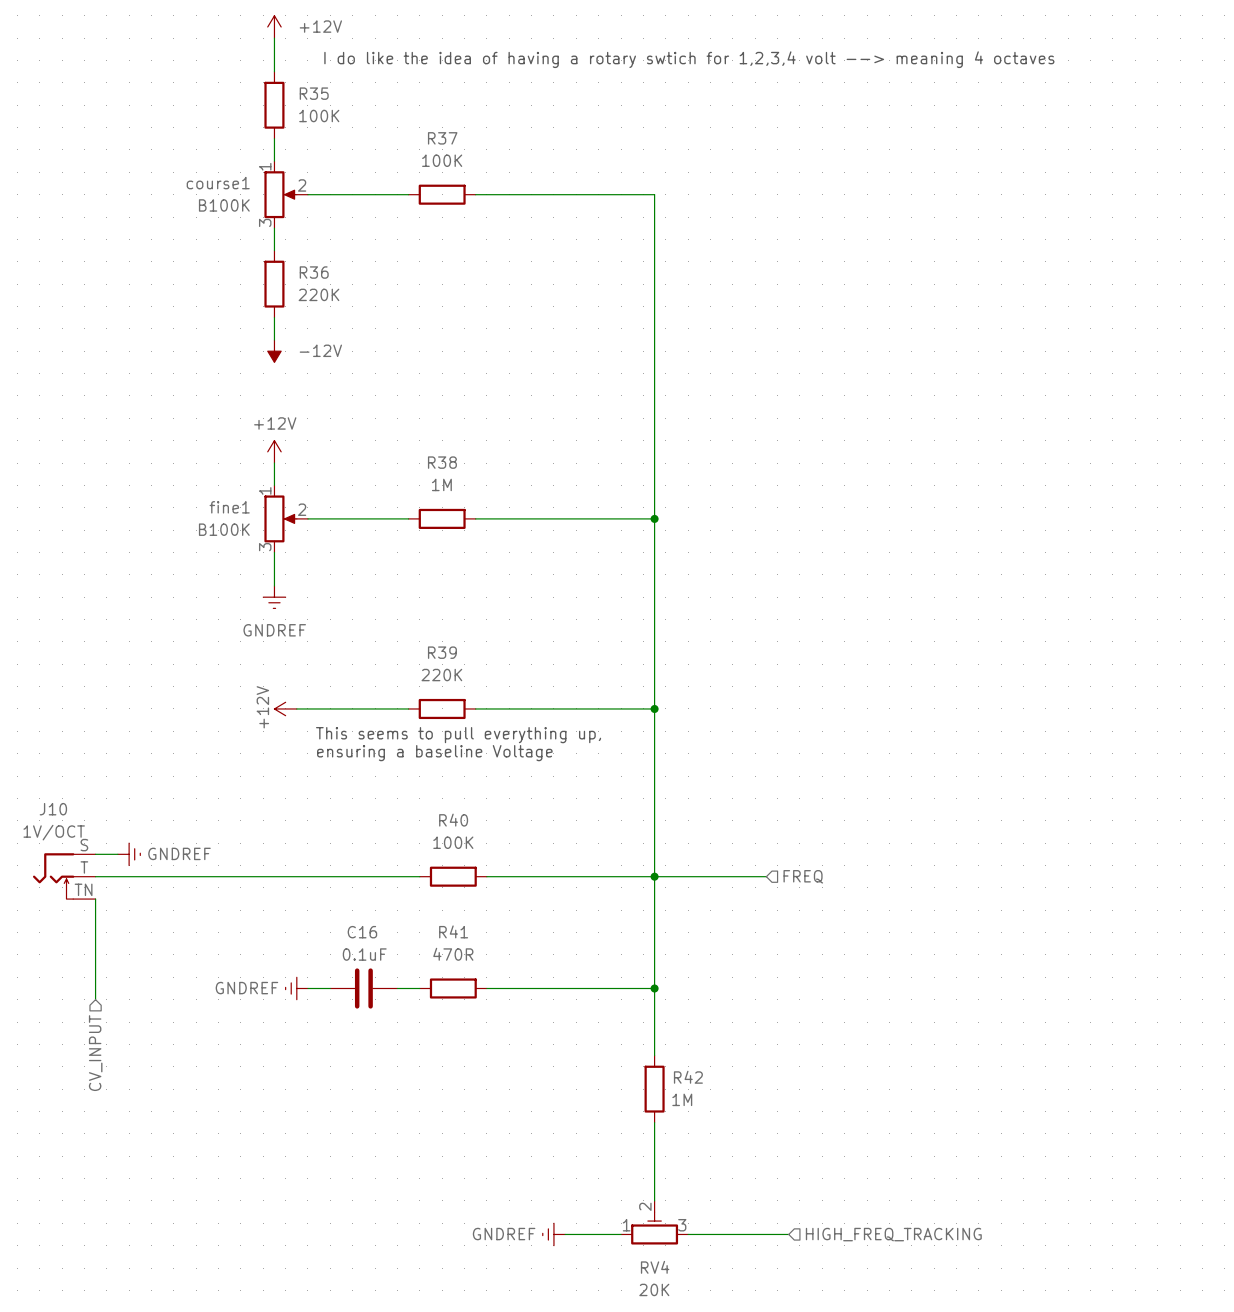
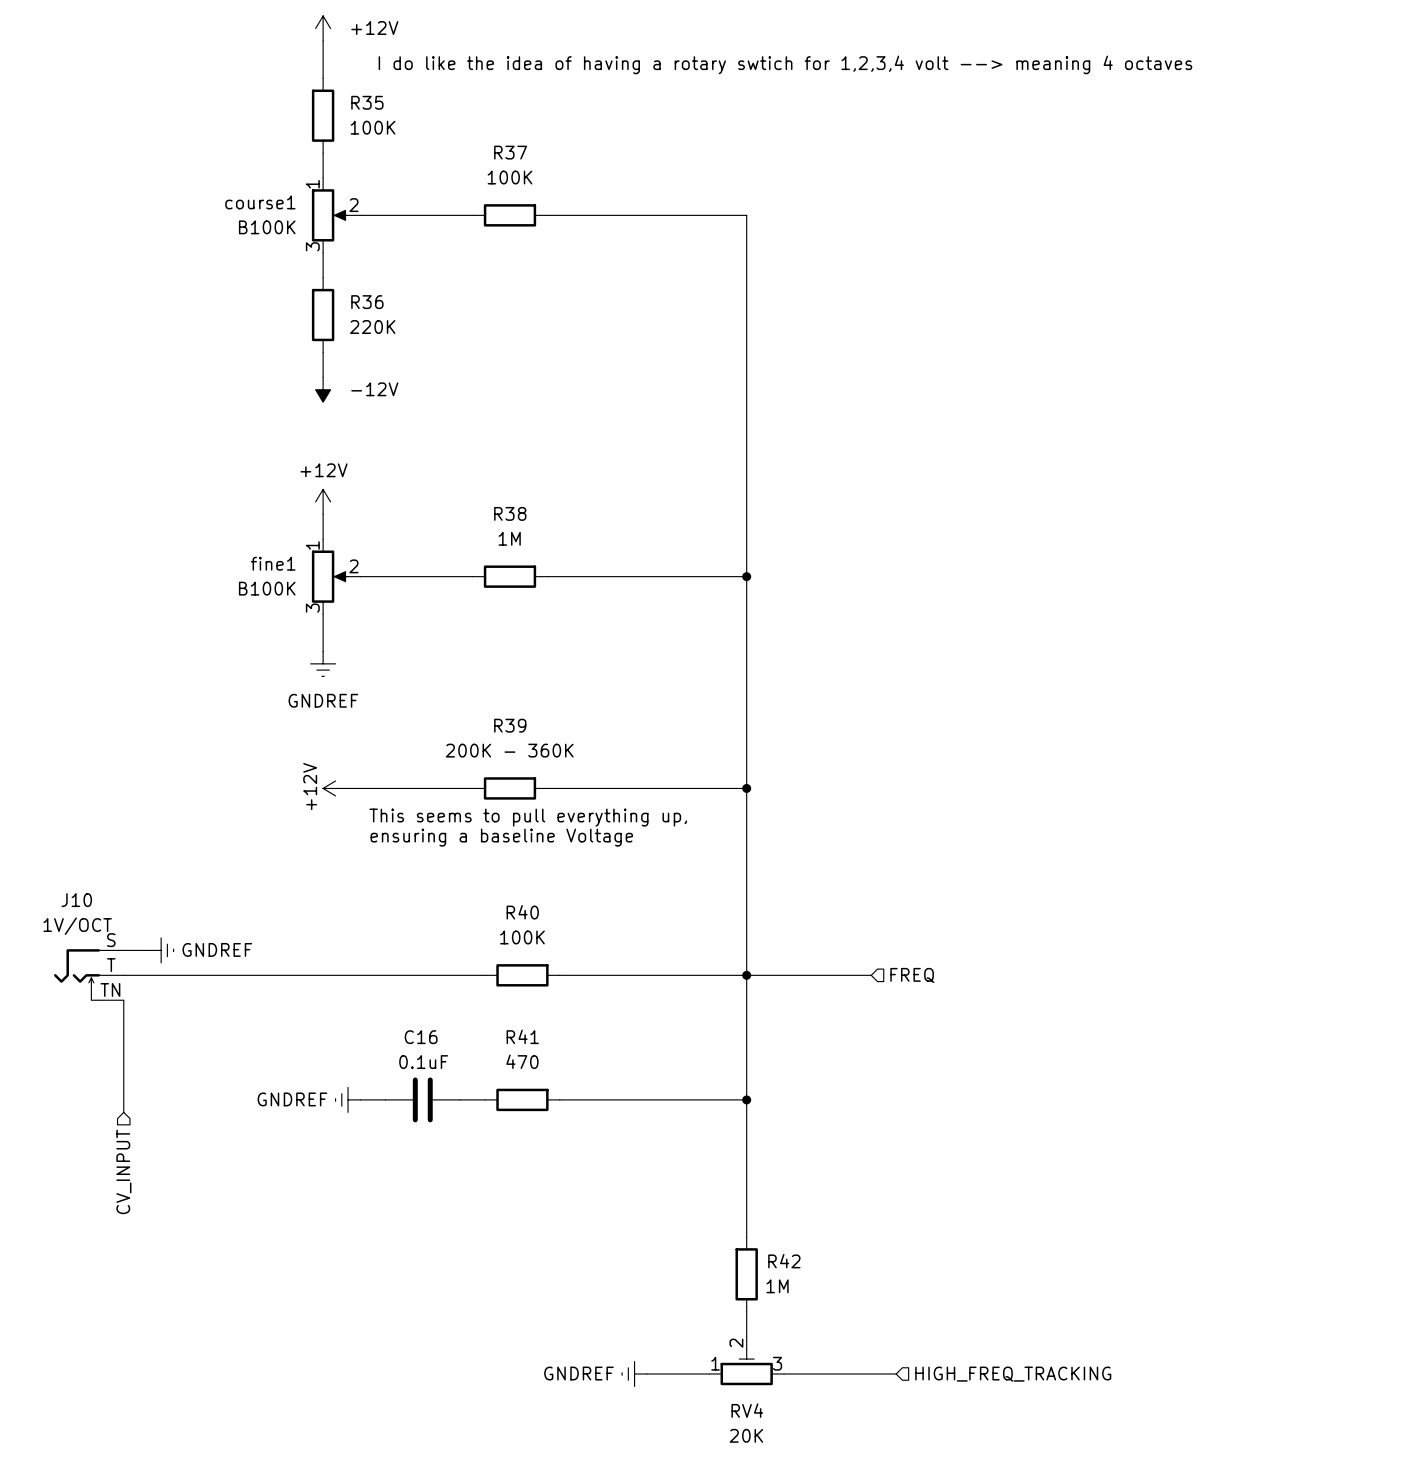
R39 value: 220K (441, 675) -> 200K - 360K (509, 750)
R41 value: 470R (453, 954) -> 470 (522, 1061)
R42 position: (654, 1089) -> (746, 1274)
wire: (654, 1122) (654, 1178) -> (746, 1174) (746, 1236)

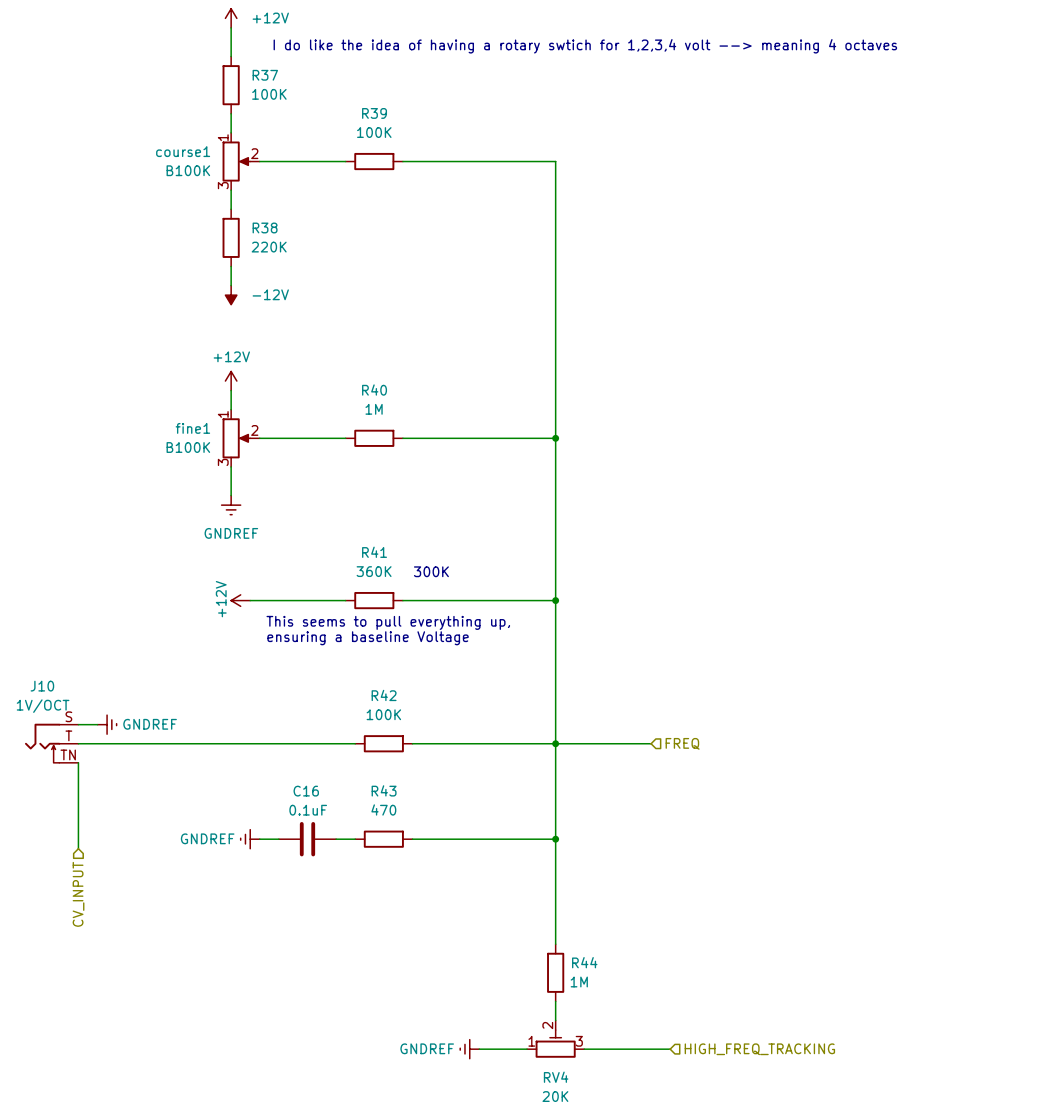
R35 name: R35 (367, 102) -> R37 (265, 75)
R37 name: R37 (510, 152) -> R39 (374, 113)
R36 name: R36 (367, 302) -> R38 (265, 227)
R38 name: R38 (510, 513) -> R40 (374, 390)
R39 name: R39 (510, 725) -> R41 (374, 552)
R39 value: 200K - 360K (509, 750) -> 360K (374, 571)
text: none -> 300K (431, 571)
R40 name: R40 (522, 912) -> R42 (384, 695)
R41 name: R41 (522, 1036) -> R43 (384, 790)
R42 name: R42 (784, 1261) -> R44 (584, 962)

